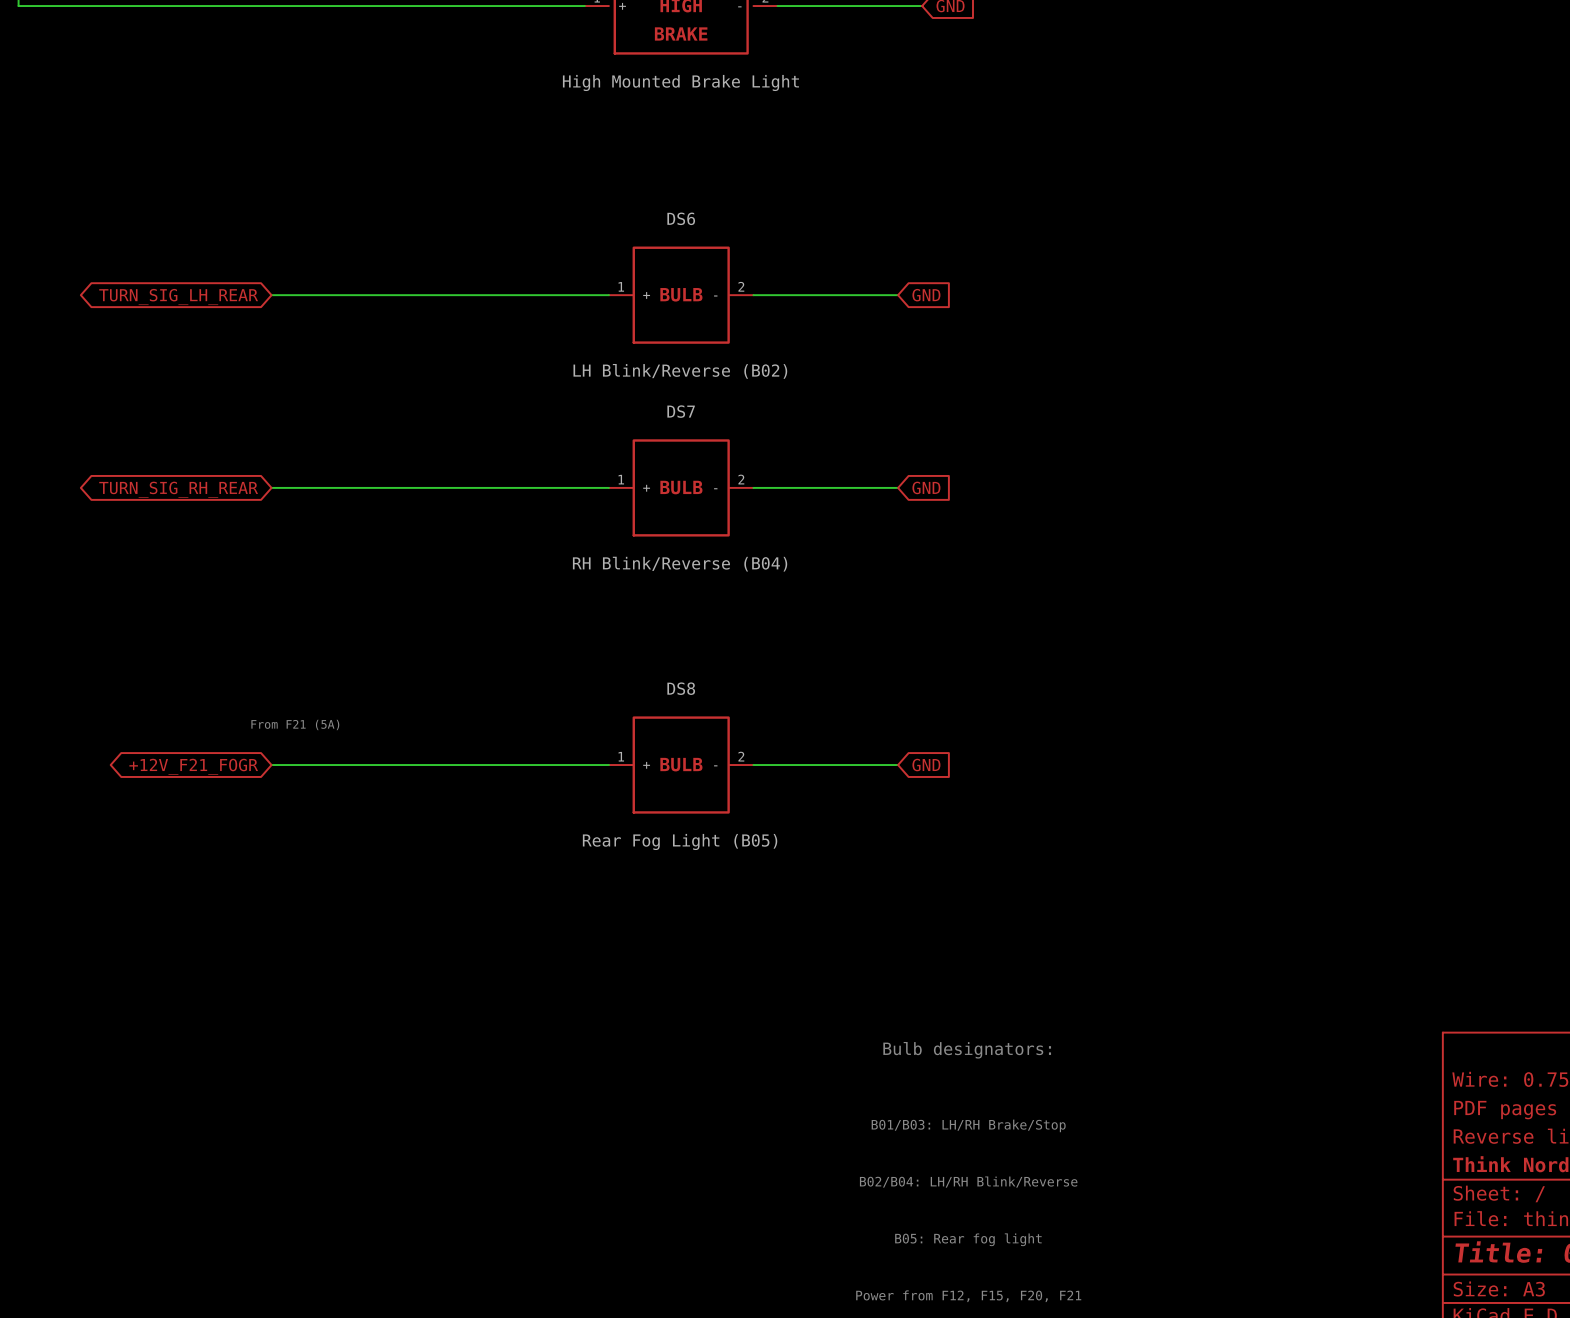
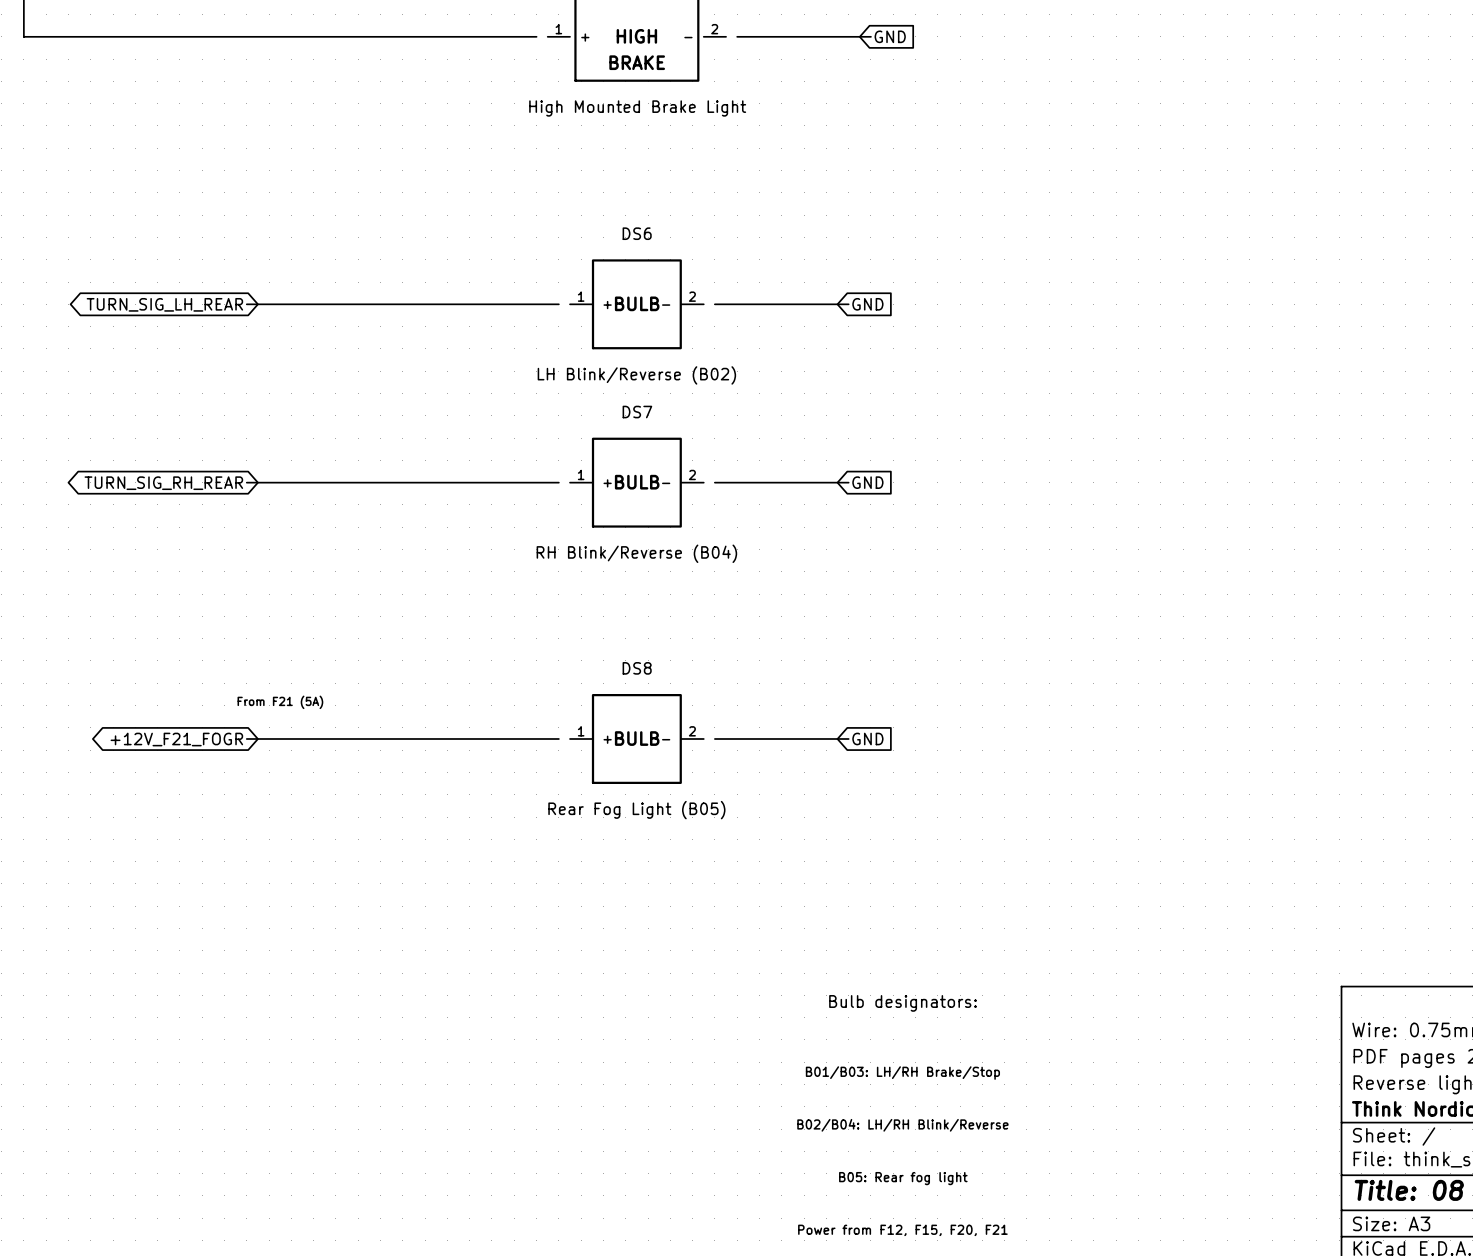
wire: (572, 6) (584, 6) -> none
wire: (777, 6) (789, 6) -> (859, 36) (870, 36)
wire: none -> (246, 304) (257, 304)
wire: (596, 295) (608, 295) -> none
wire: (753, 295) (765, 295) -> (837, 304) (848, 304)
wire: none -> (246, 482) (257, 482)
wire: (596, 487) (608, 487) -> none
wire: (753, 487) (765, 487) -> (837, 482) (848, 482)
wire: none -> (246, 738) (257, 738)
wire: (596, 765) (608, 765) -> none
wire: (753, 765) (765, 765) -> (837, 738) (848, 738)

